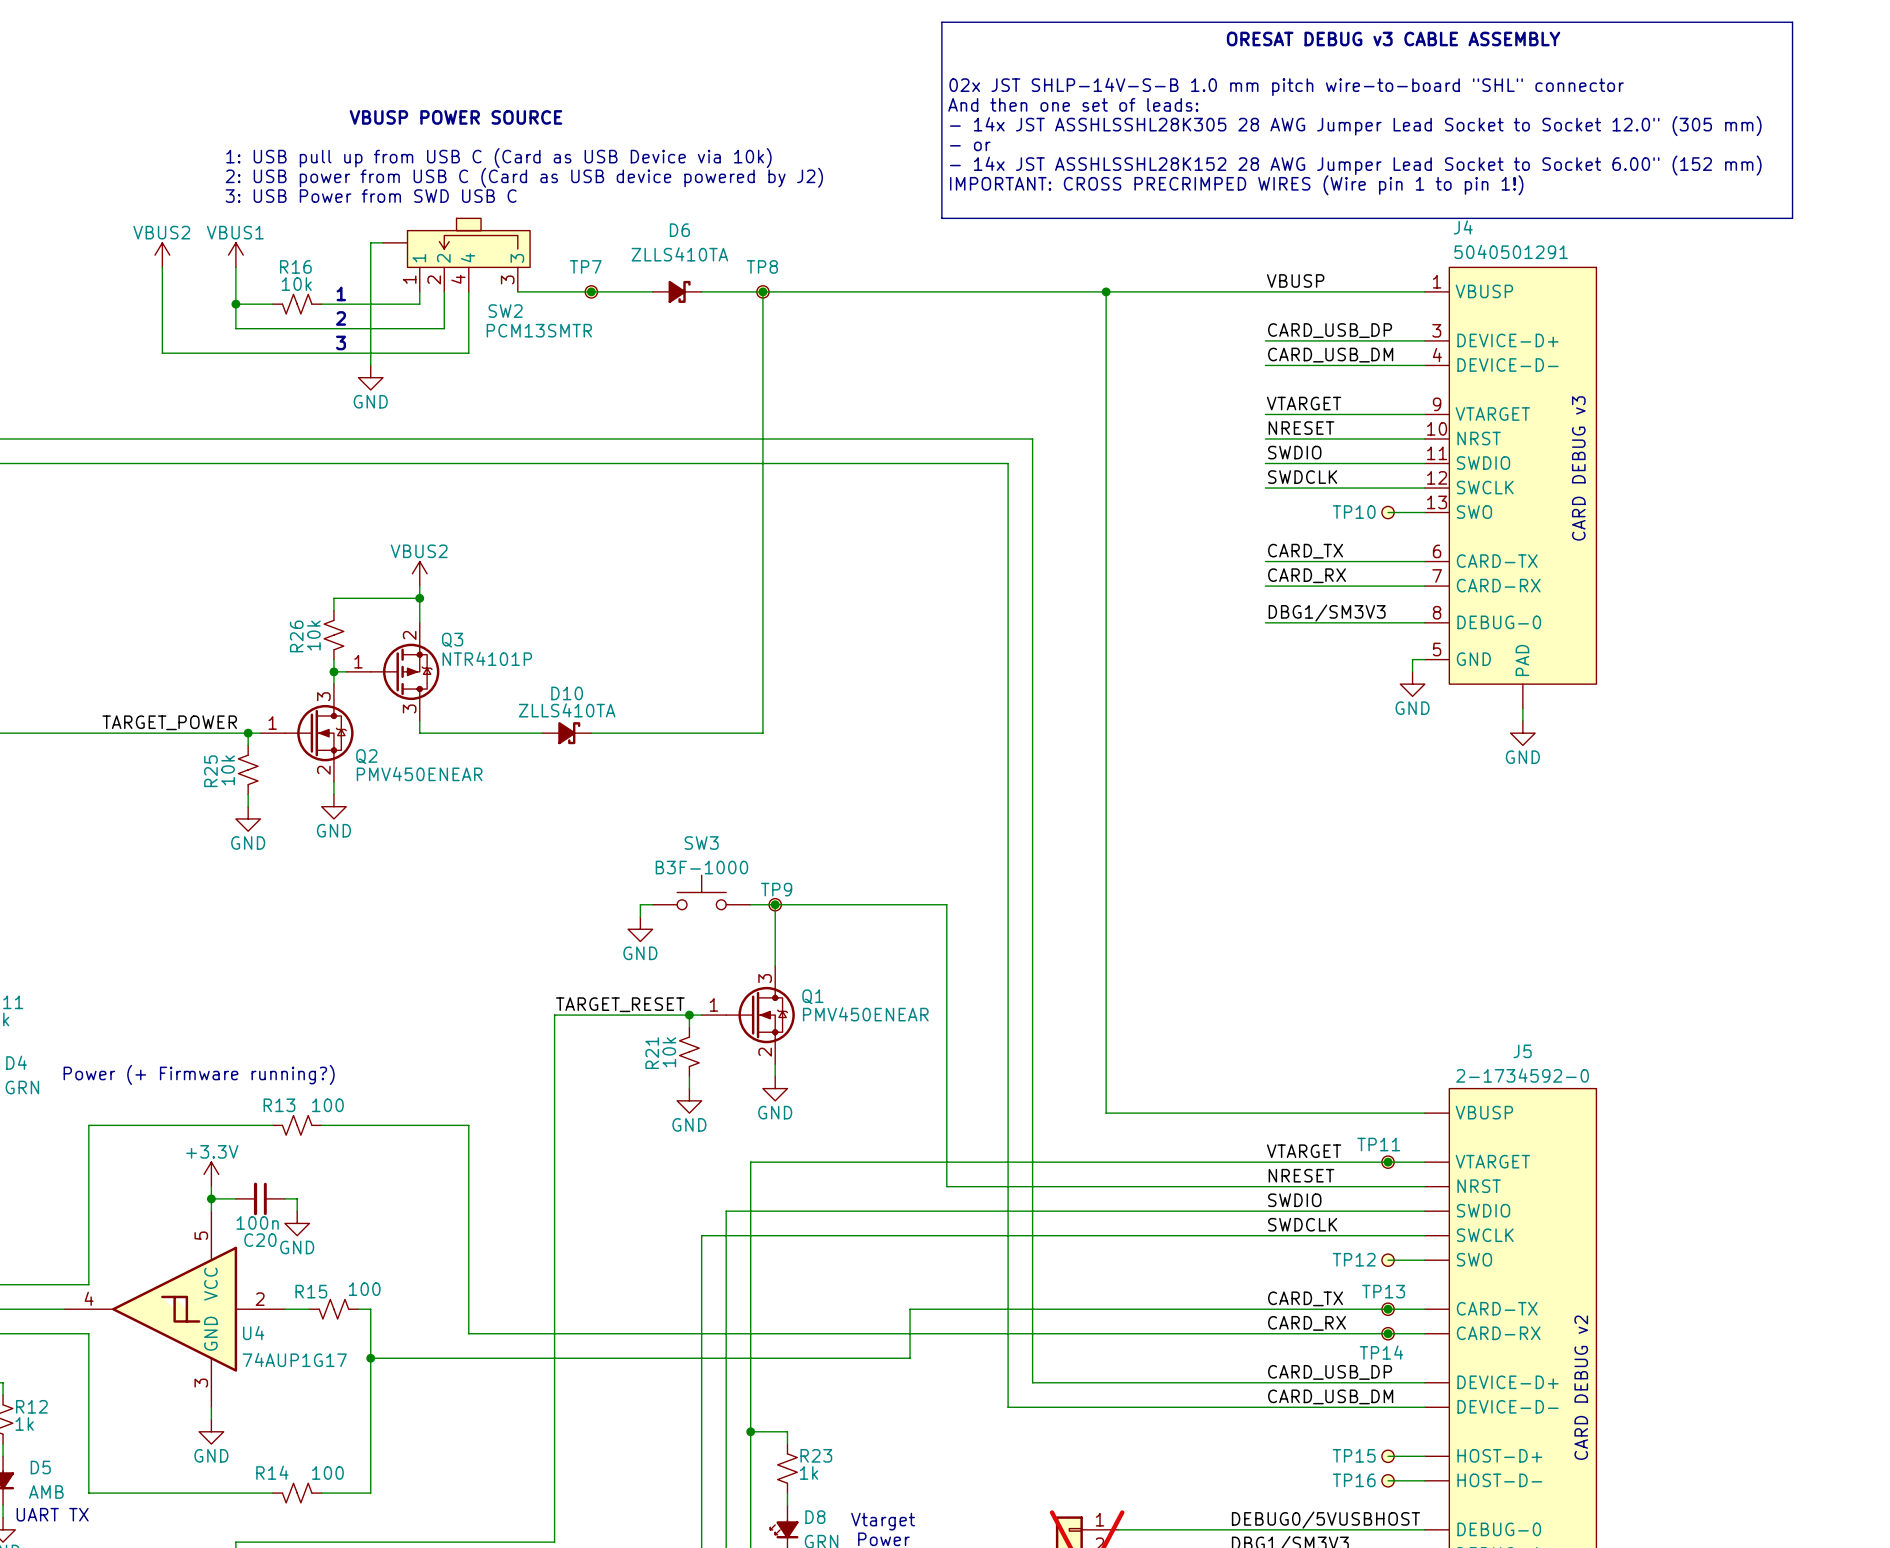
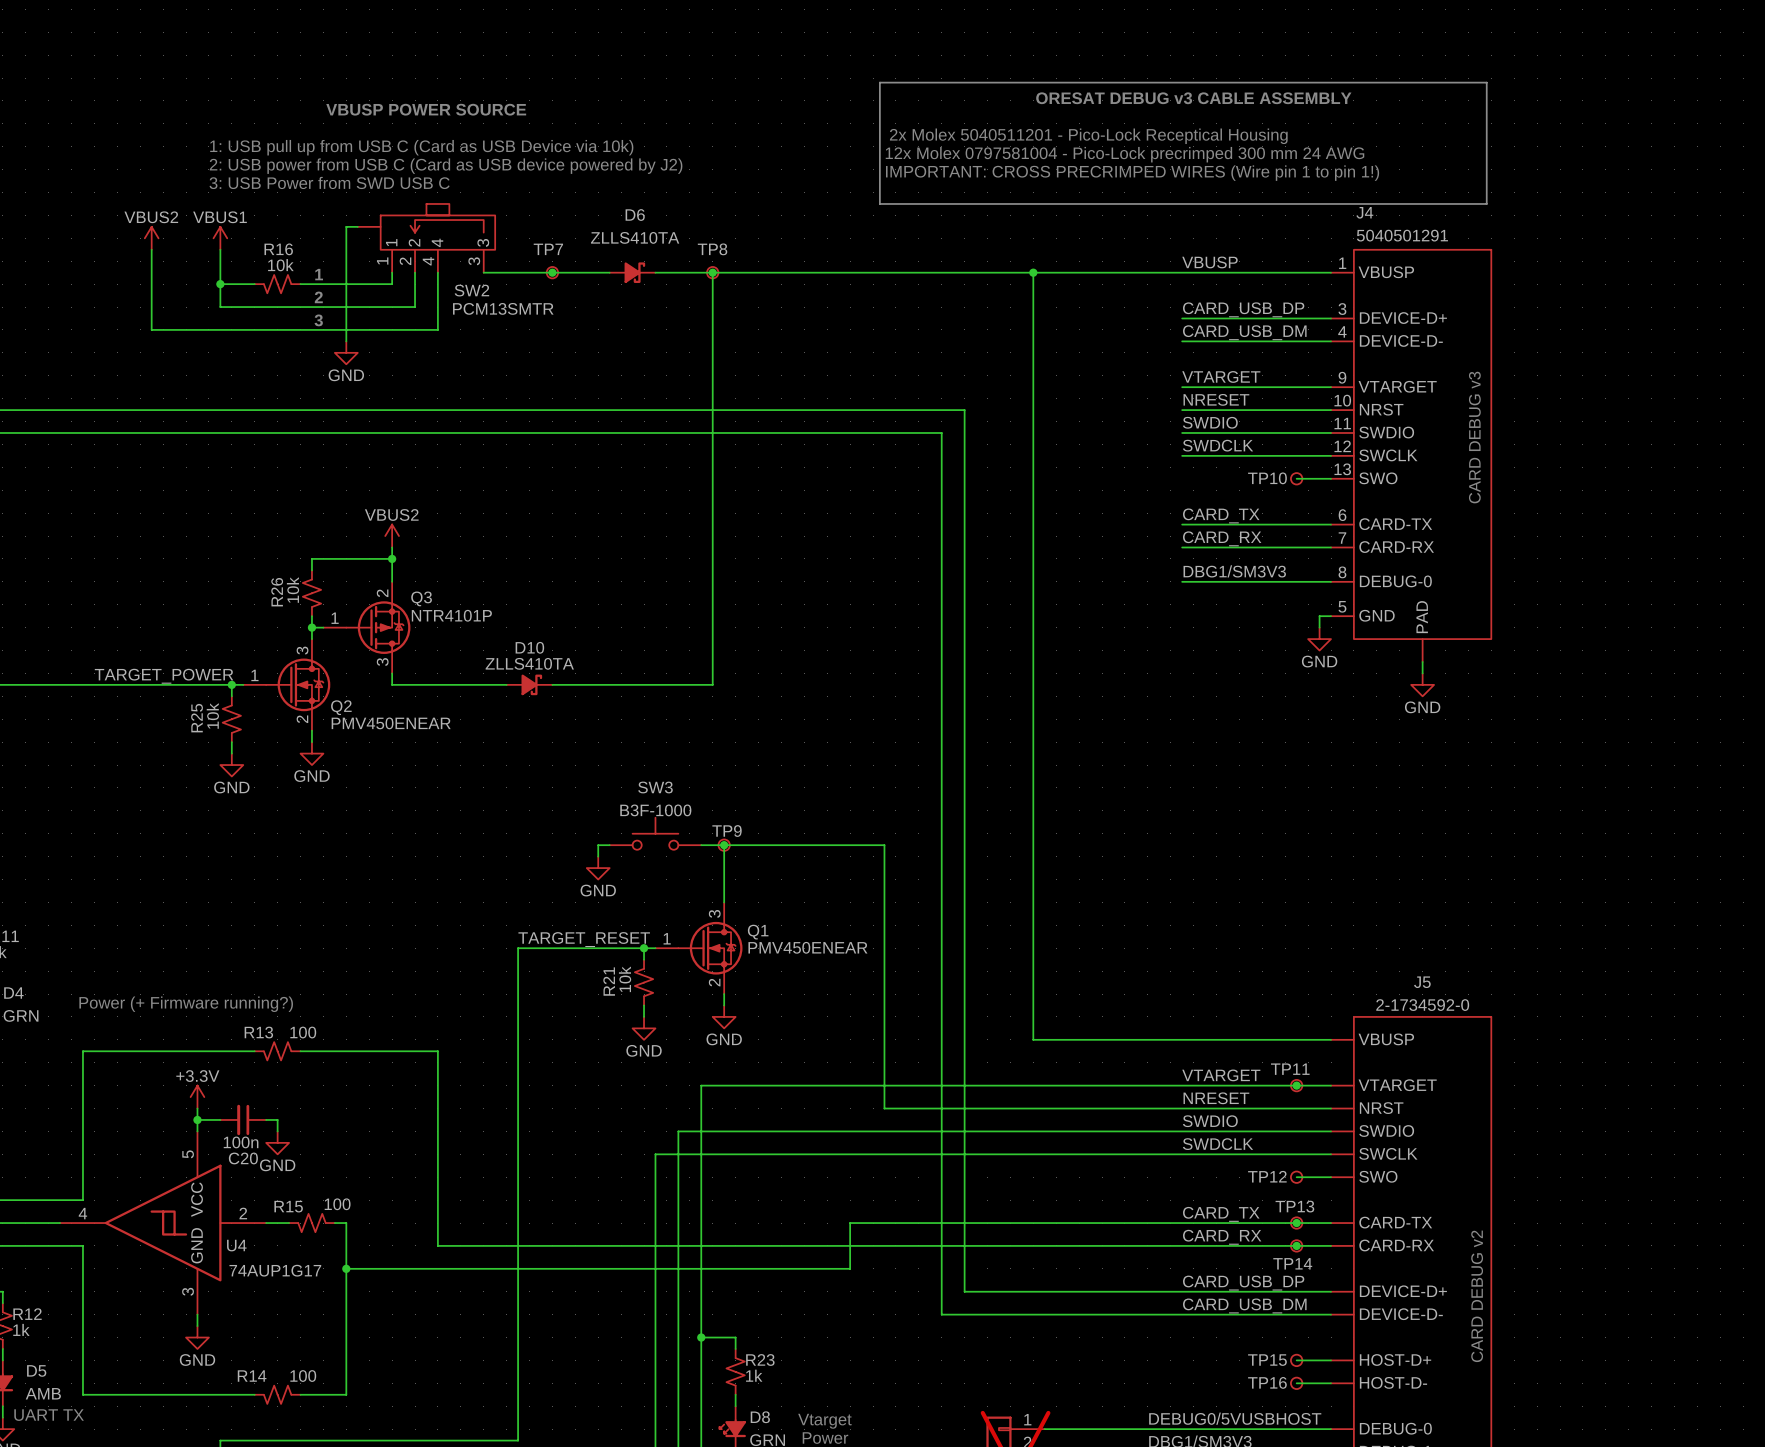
text position: ORESAT DEBUG v3 CABLE ASSEMBLY (1393, 38) -> ORESAT DEBUG v3 CABLE ASSEMBLY (1193, 98)
text: 02x JST SHLP-14V-S-B 1.0 mm pitch wire-to-board "SHL" connector (1286, 86) -> none
line: (941, 88) (941, 22) (1792, 22) (1792, 218) (1591, 218) -> (879, 82) (1486, 82) (1486, 203)
text: And then one set of leads: (1073, 104) -> none
text: - 14x JST ASSHLSSHL28K305 28 AWG Jumper Lead Socket to Socket 12.0" (305 mm) (1355, 126) -> none
text: - or (970, 146) -> 2x Molex 5040511201 - Pico-Lock Receptical Housing (1088, 136)
text: - 14x JST ASSHLSSHL28K152 28 AWG Jumper Lead Socket to Socket 6.00" (152 mm) (1355, 165) -> 12x Molex 0797581004 - Pico-Lock precrimped 300 mm 24 AWG (1124, 154)

